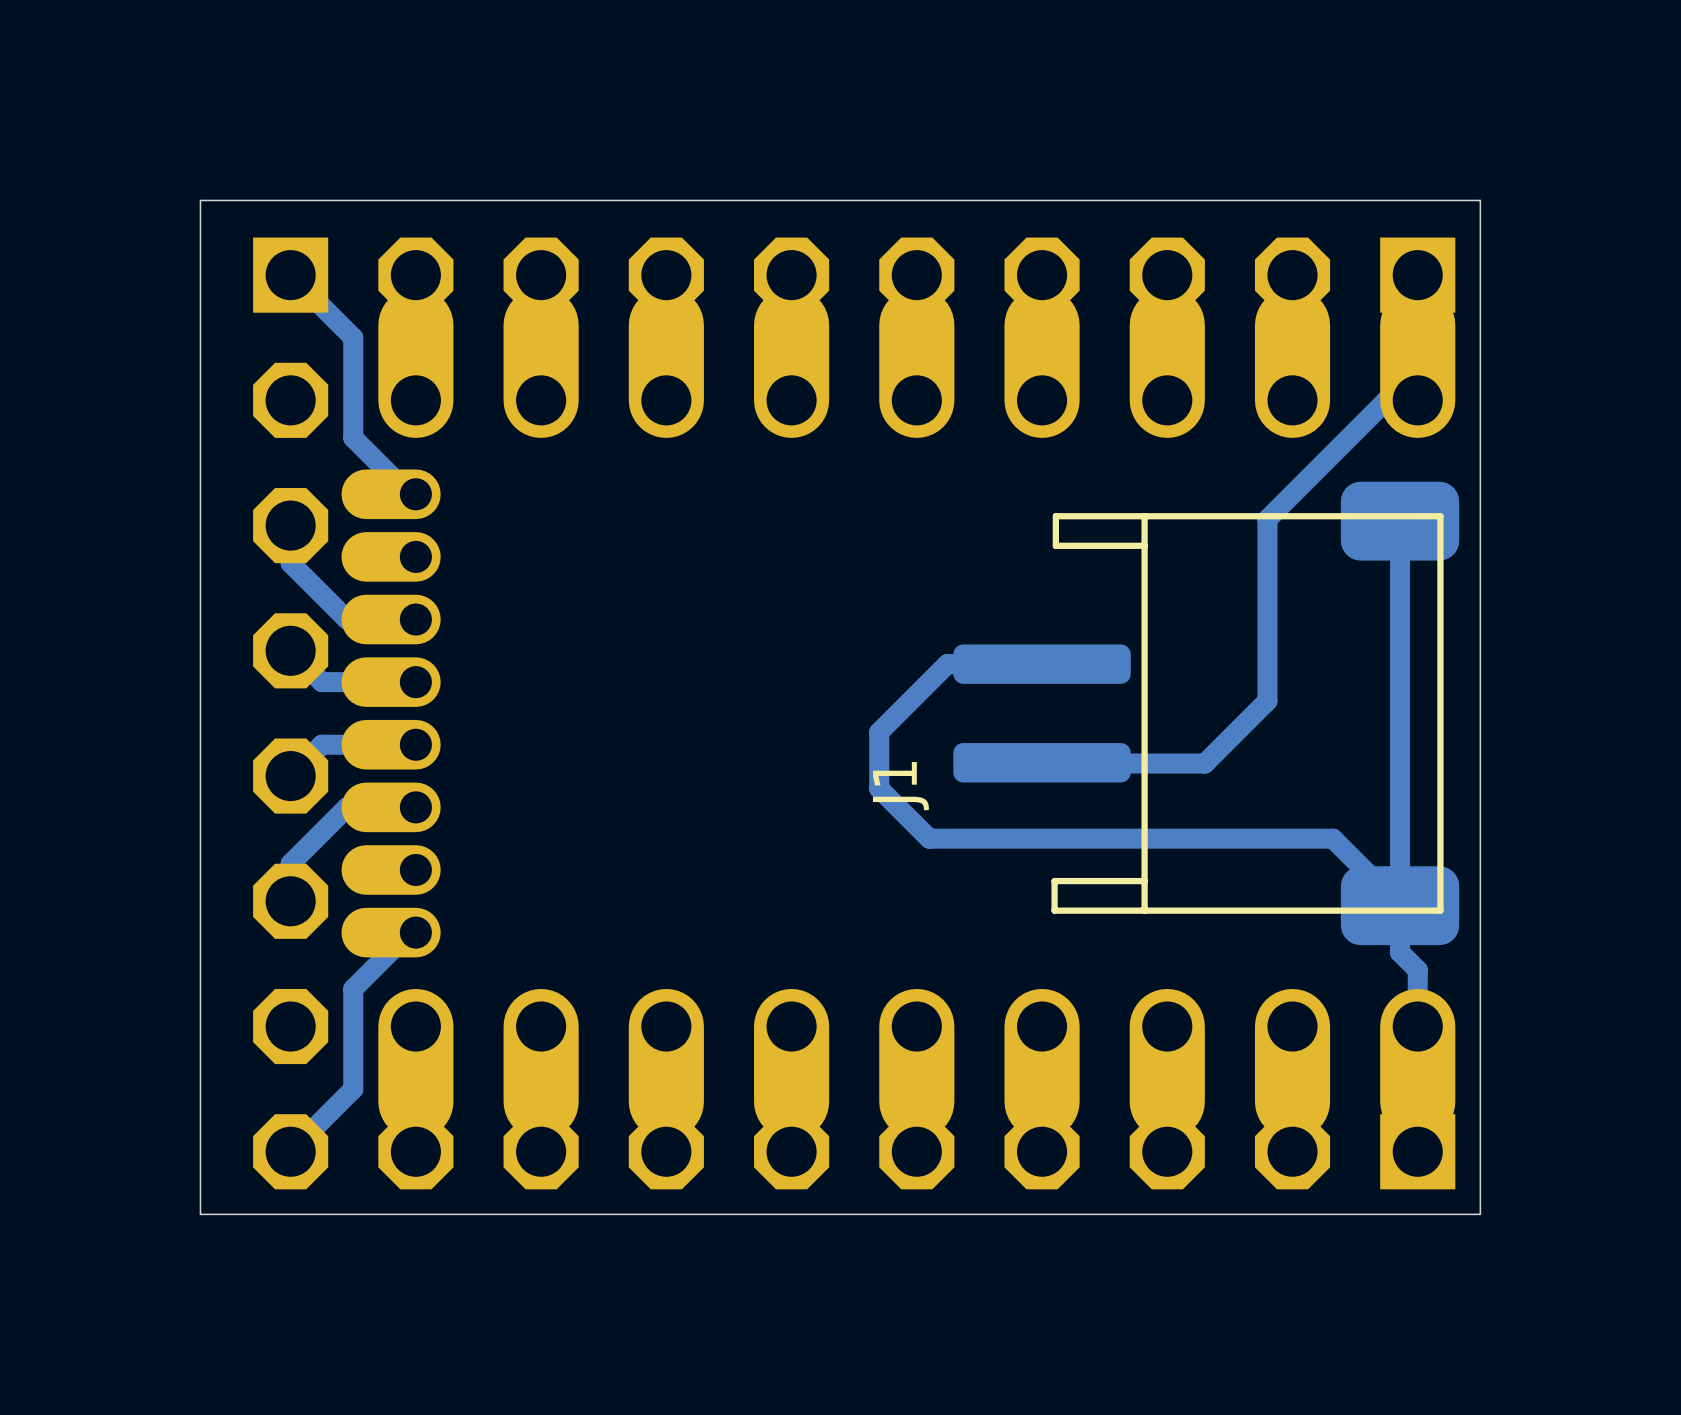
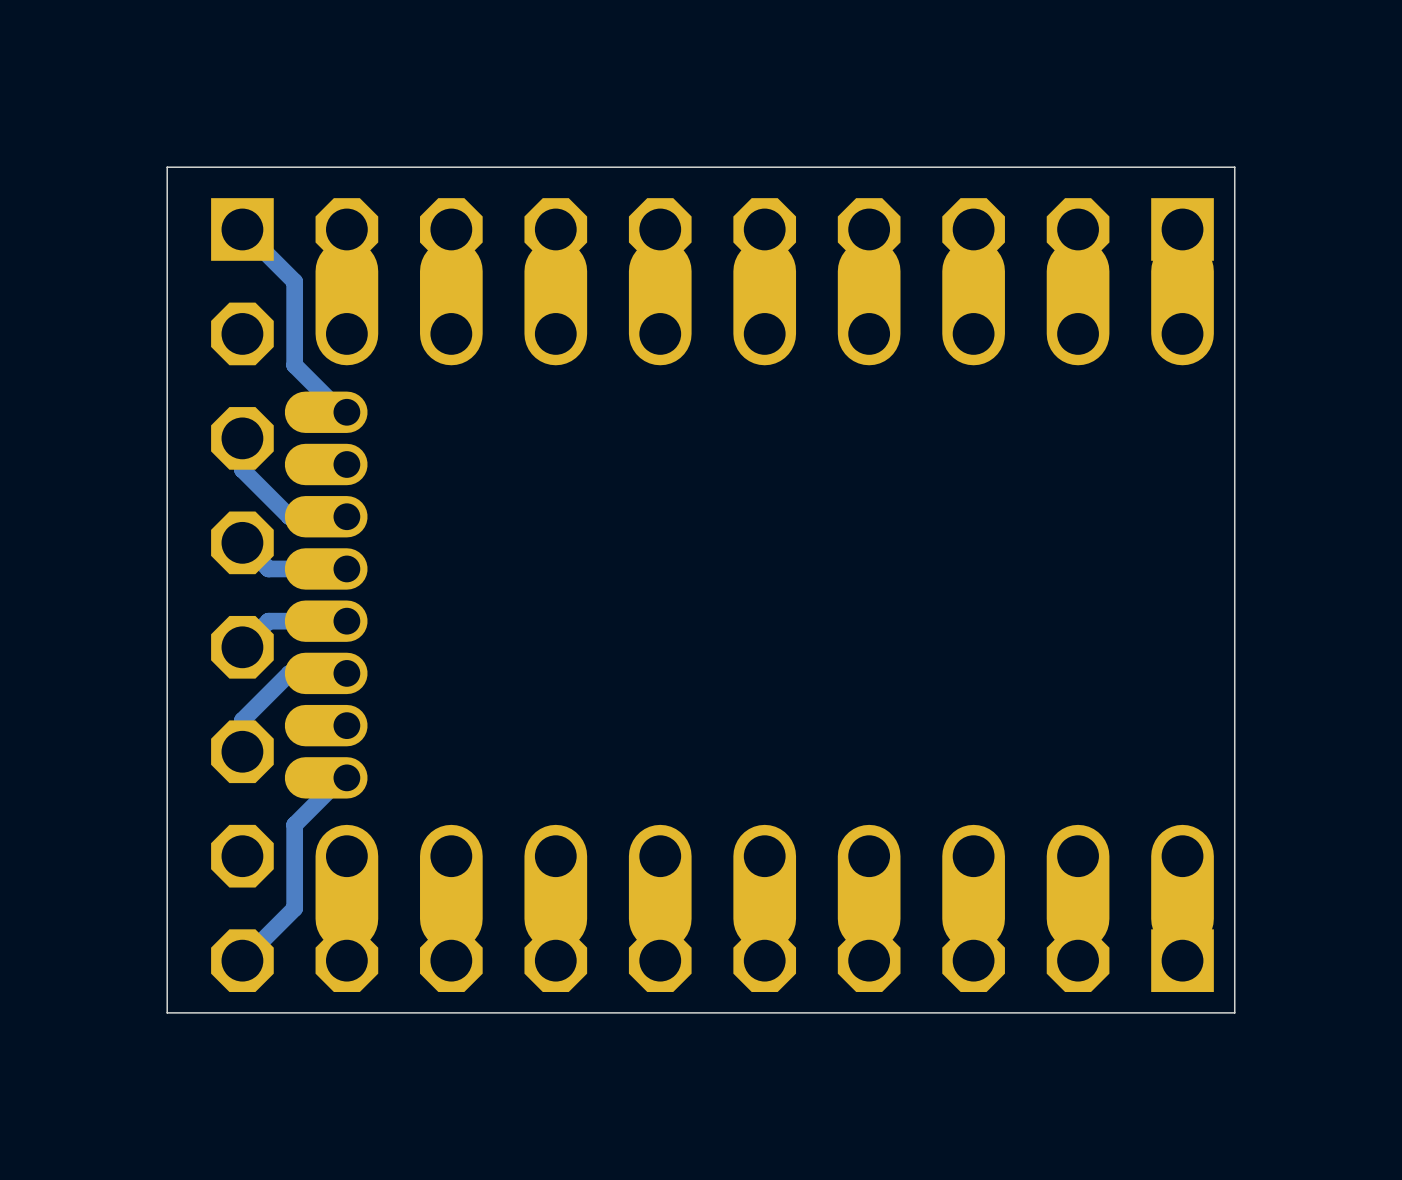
track: (1417, 400) (1386, 400) (1267, 519) (1267, 700) (1204, 763) (1042, 762) -> none
track: (1400, 521) (1400, 952) (1417, 970) (1417, 1026) -> none
track: (1042, 664) (947, 664) (879, 732) (879, 788) (929, 838) (1332, 838) (1400, 905) -> none
J1: (1206, 713) -> none

